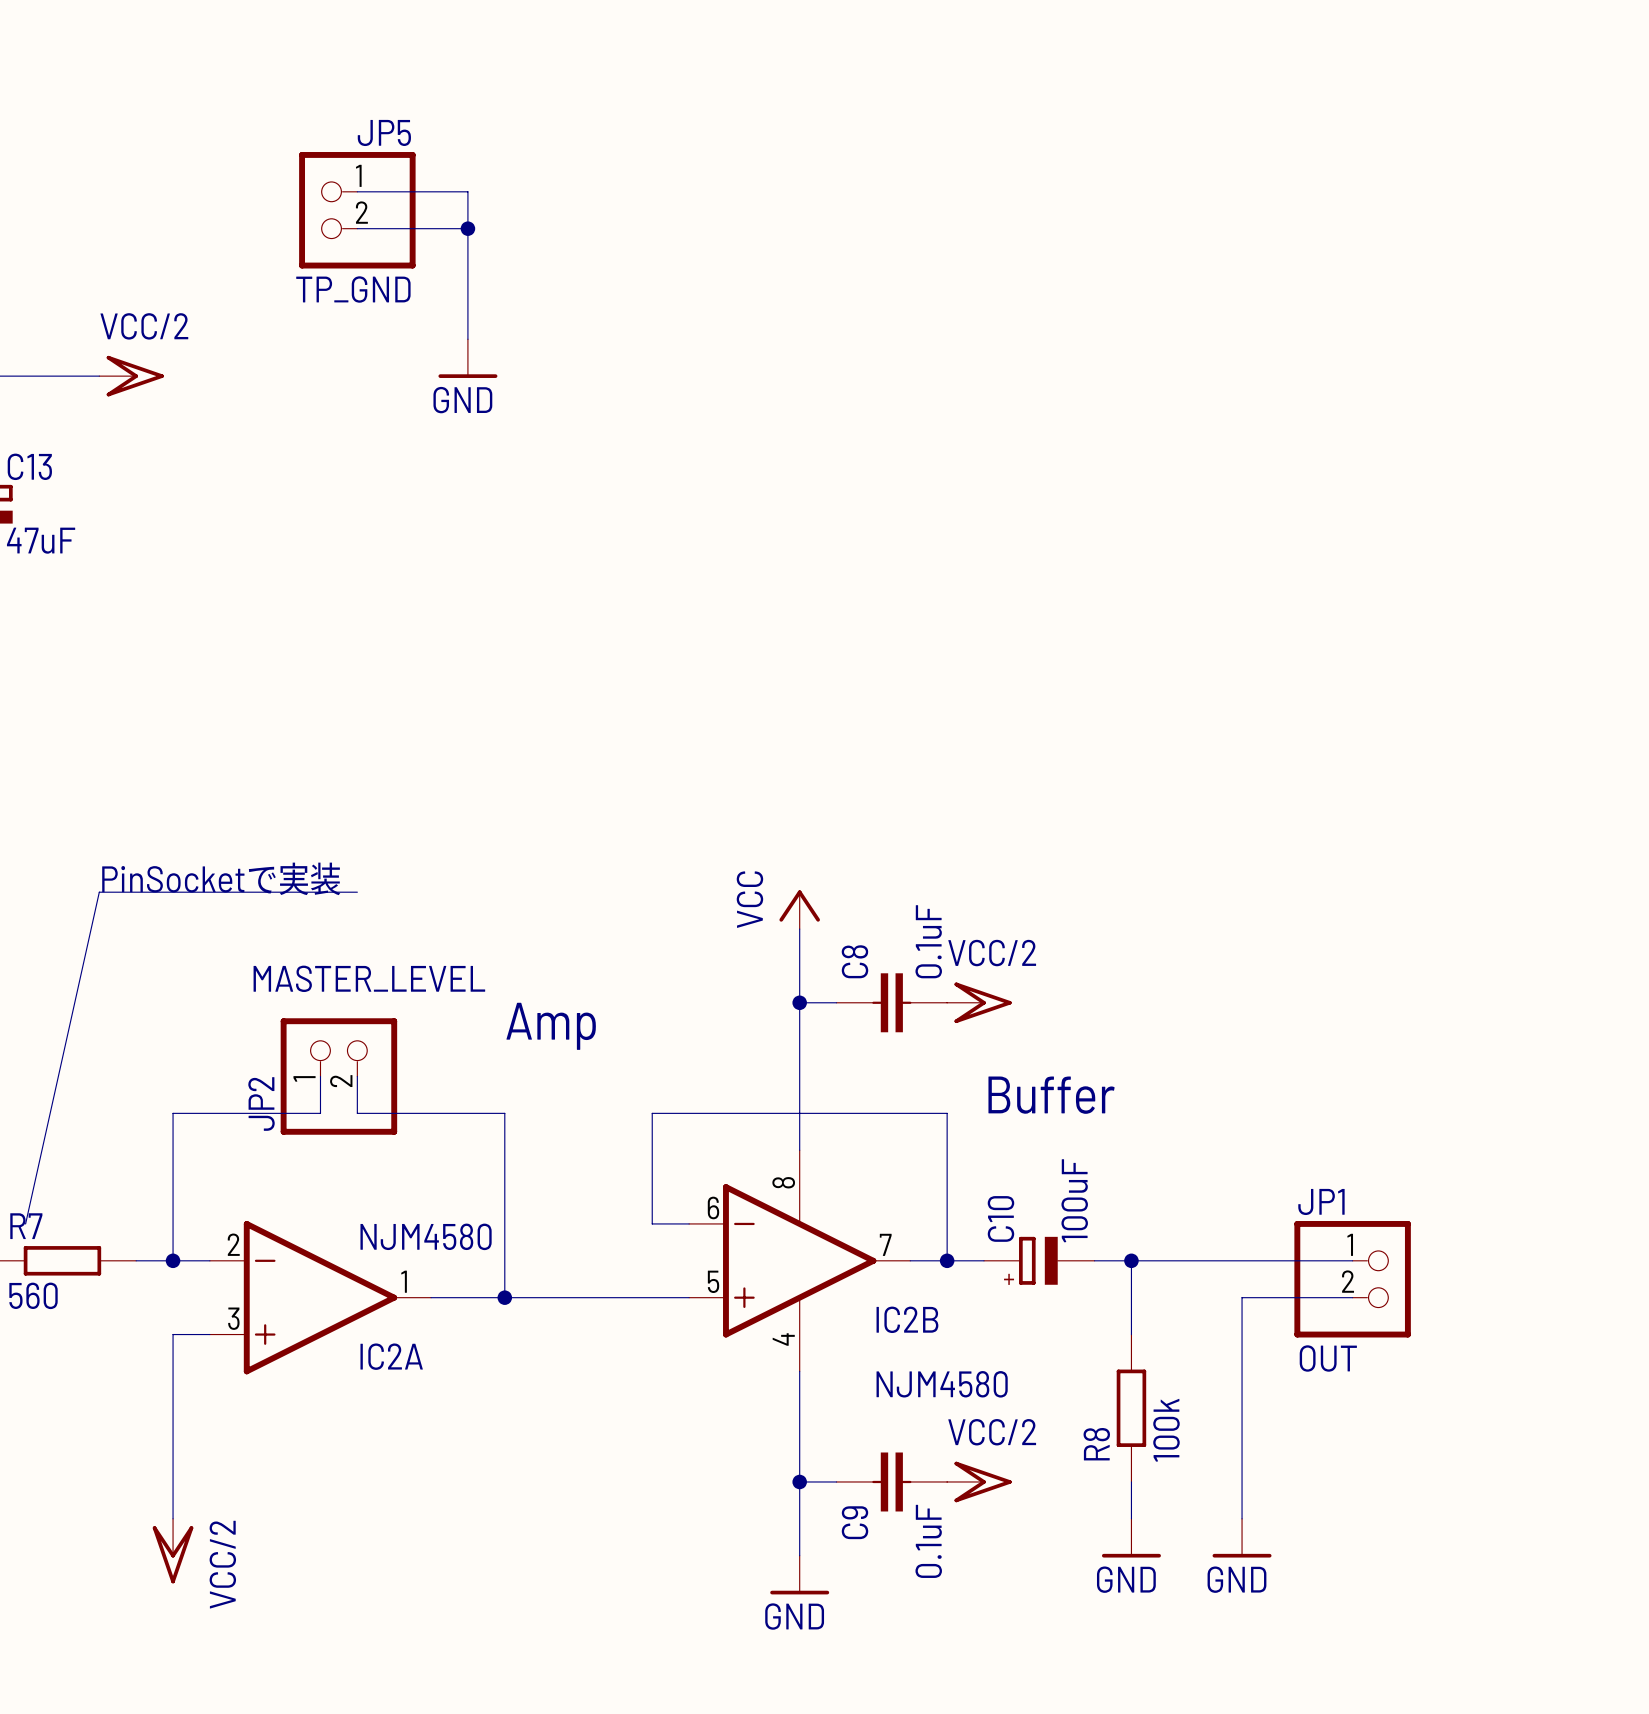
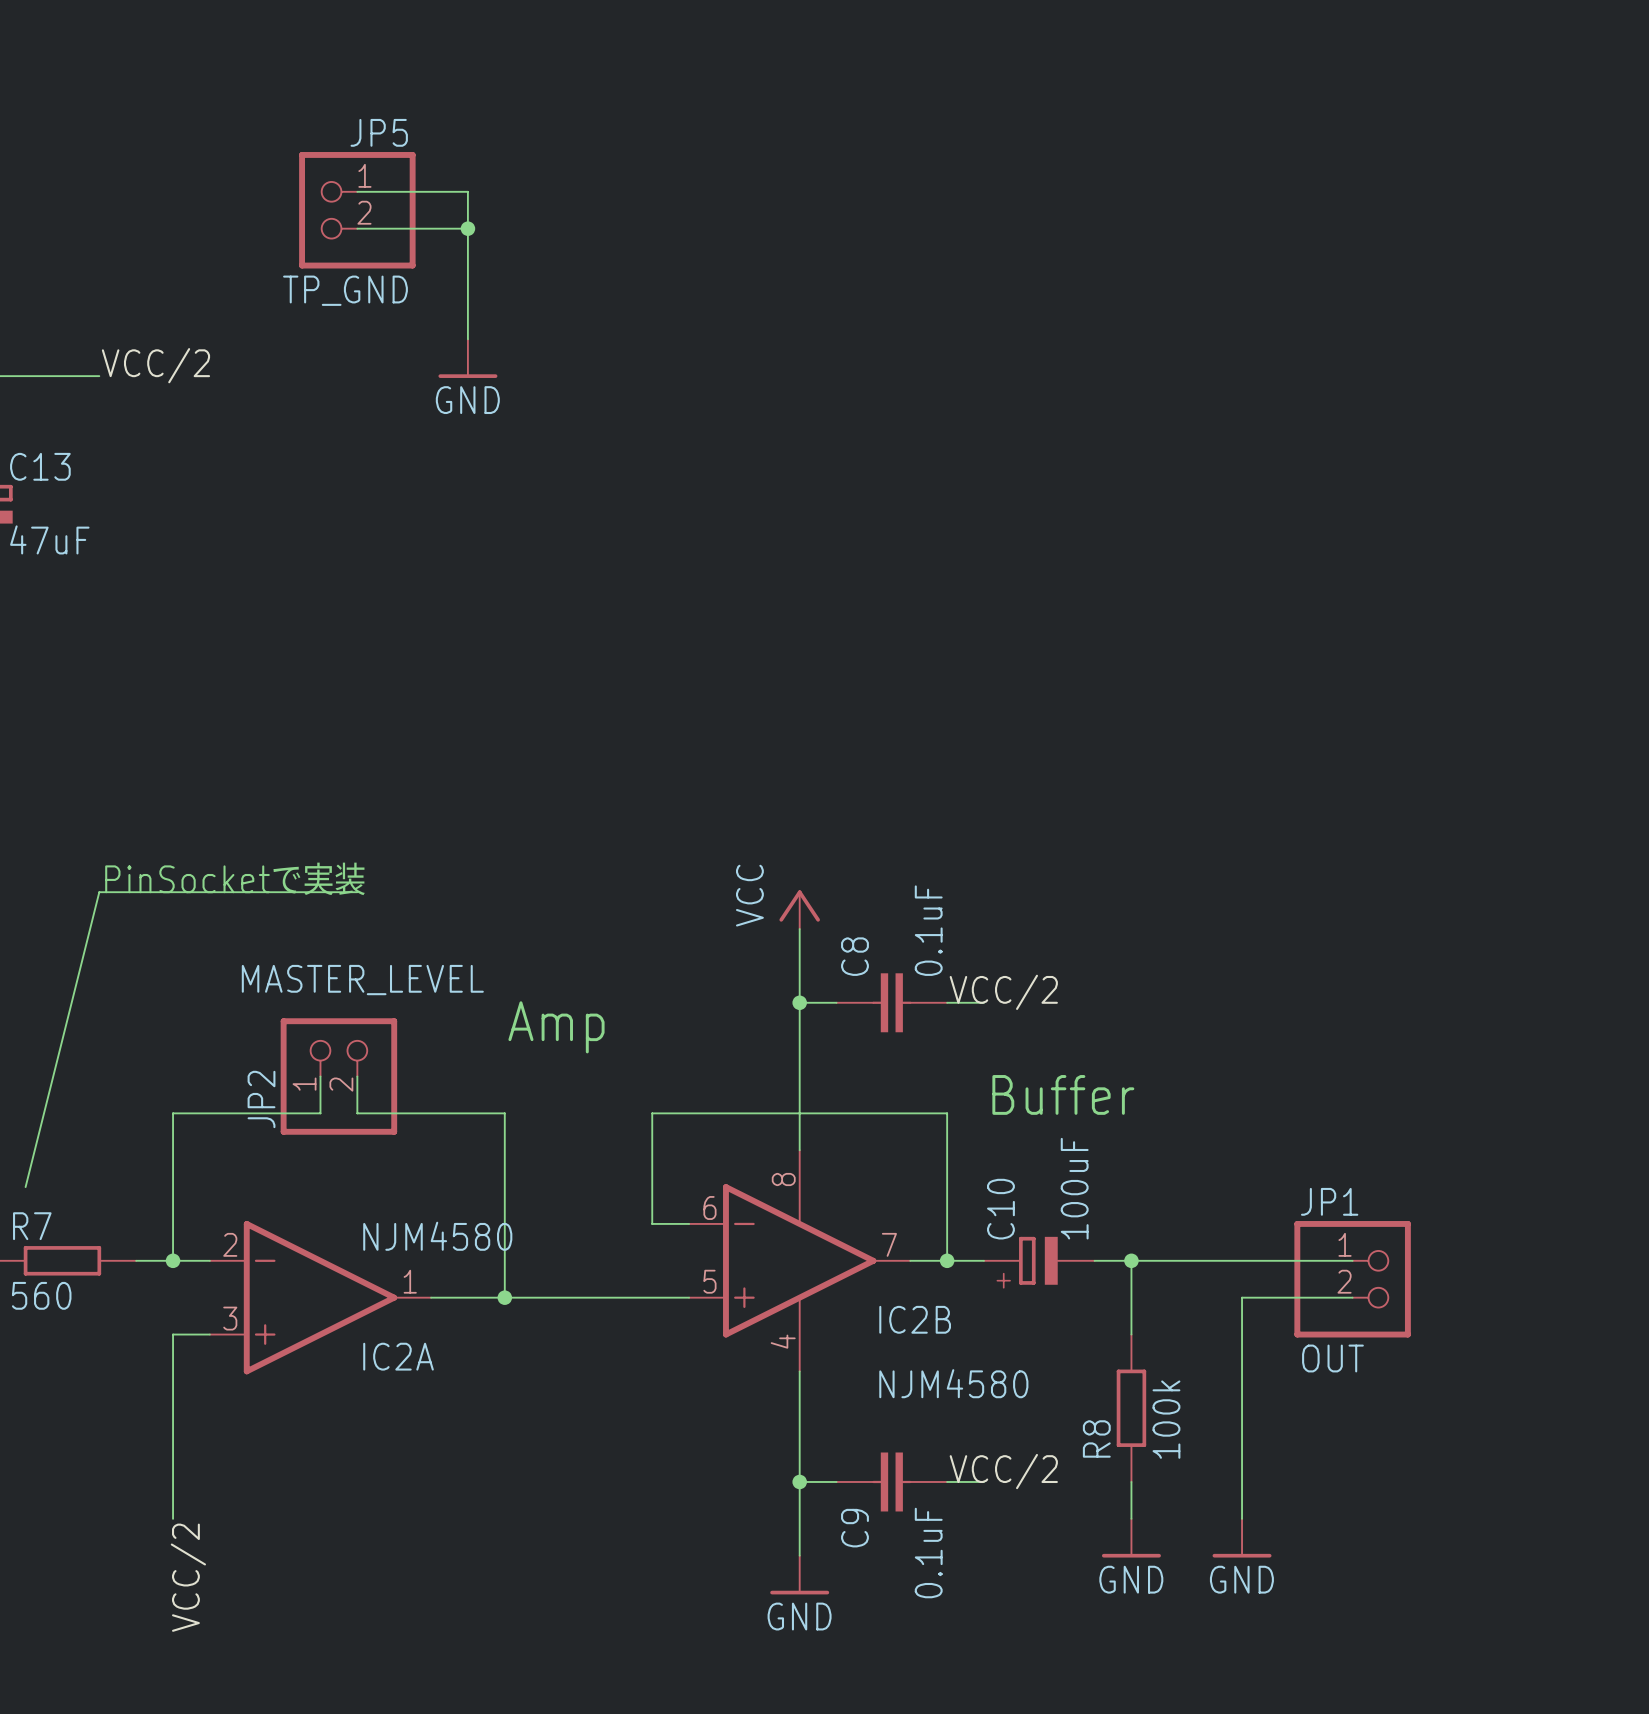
label: none -> VCC/2 (155, 365)
power symbol: VCC/2 (131, 376) -> none
wire: (99, 892) (25, 1223) -> (99, 892) (25, 1187)
label: none -> VCC/2 (1003, 992)
power symbol: VCC/2 (979, 1002) -> none
label: none -> VCC/2 (1003, 1471)
power symbol: VCC/2 (979, 1481) -> none
power symbol: VCC/2 (173, 1551) -> none
label: none -> VCC/2 (188, 1577)

